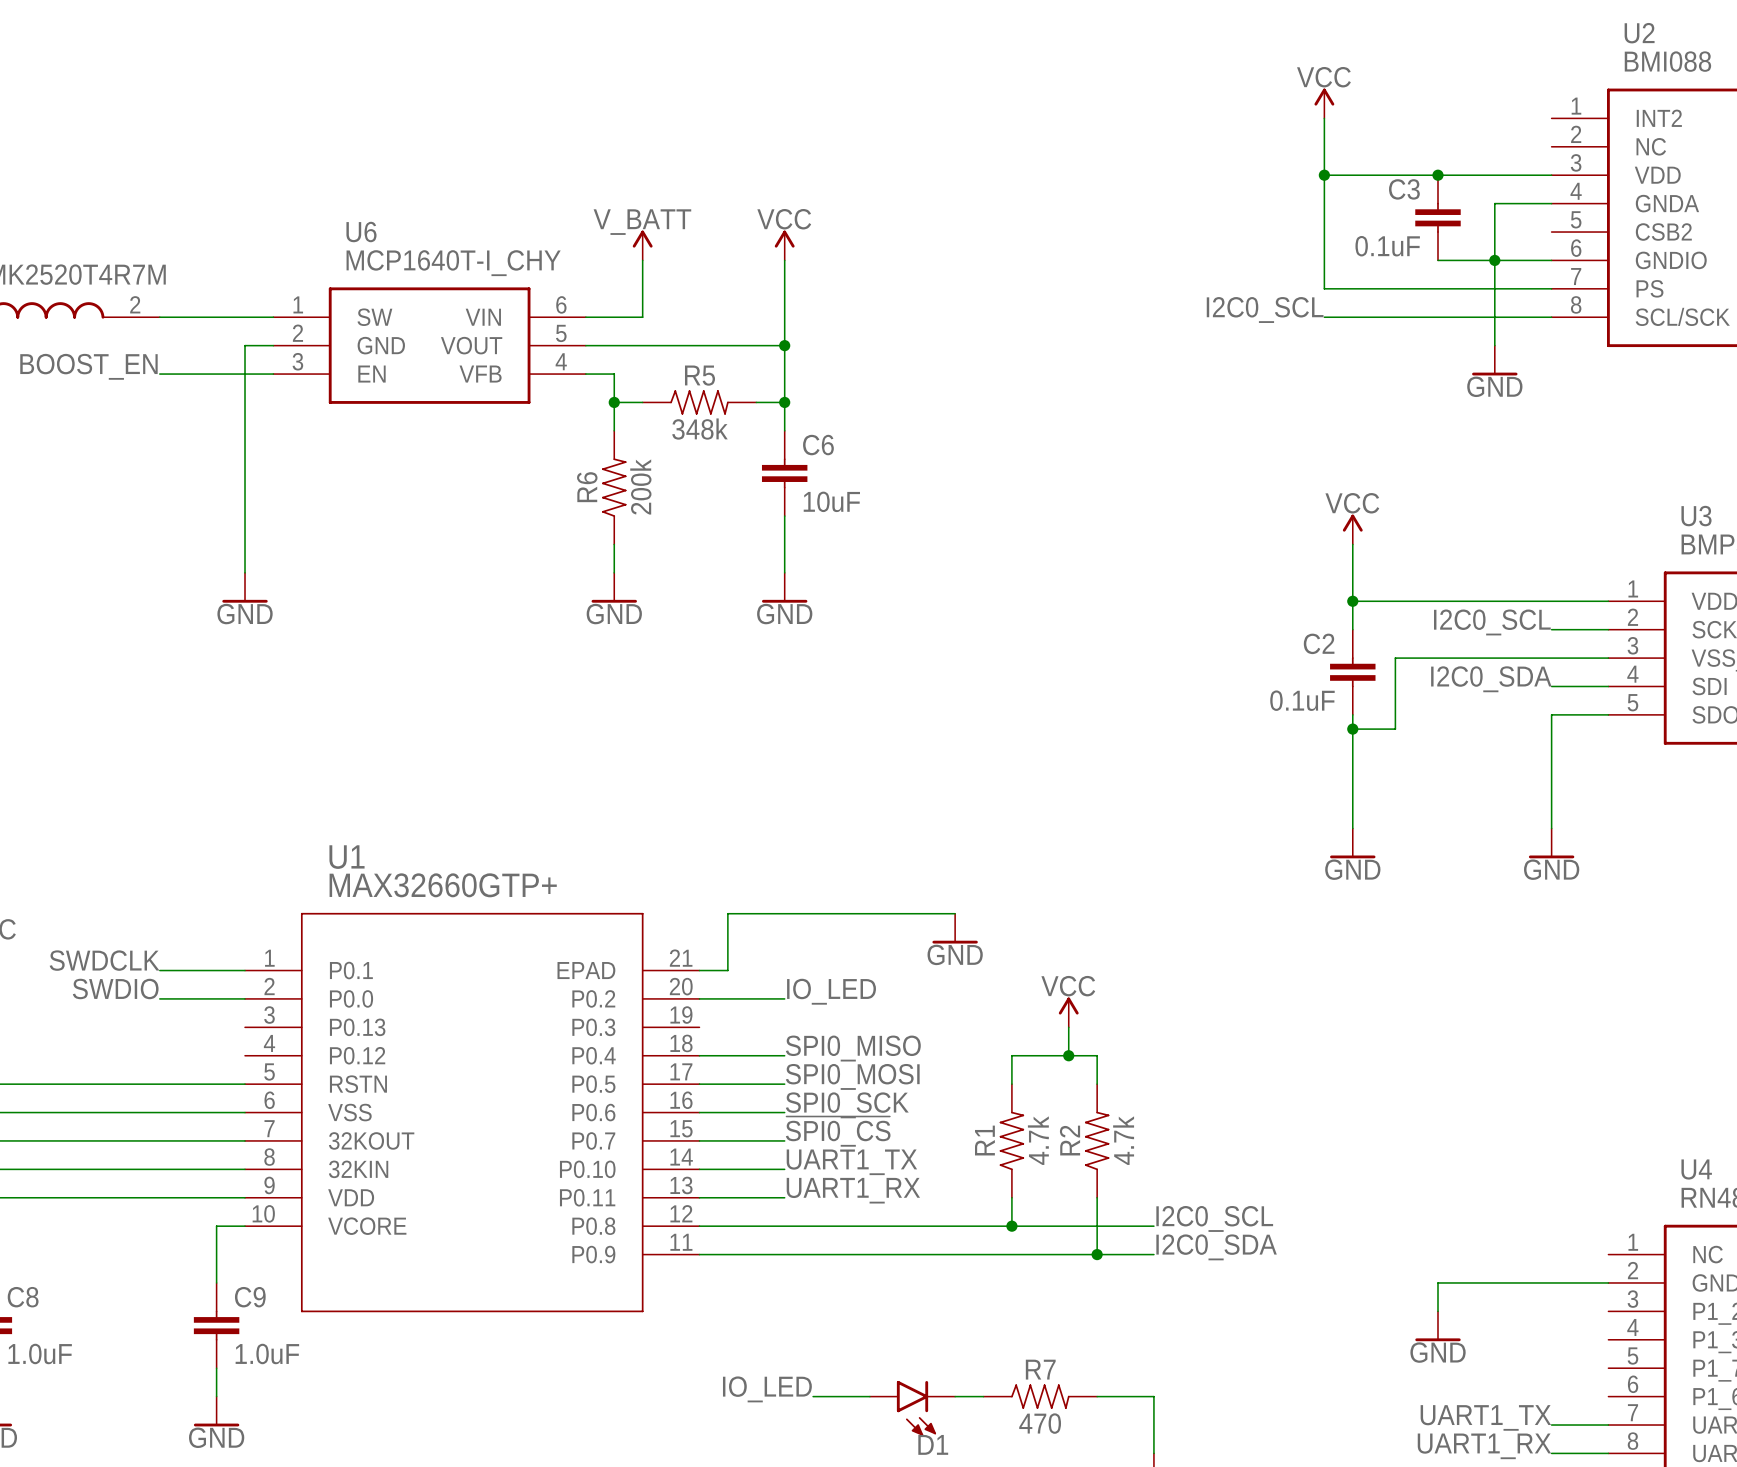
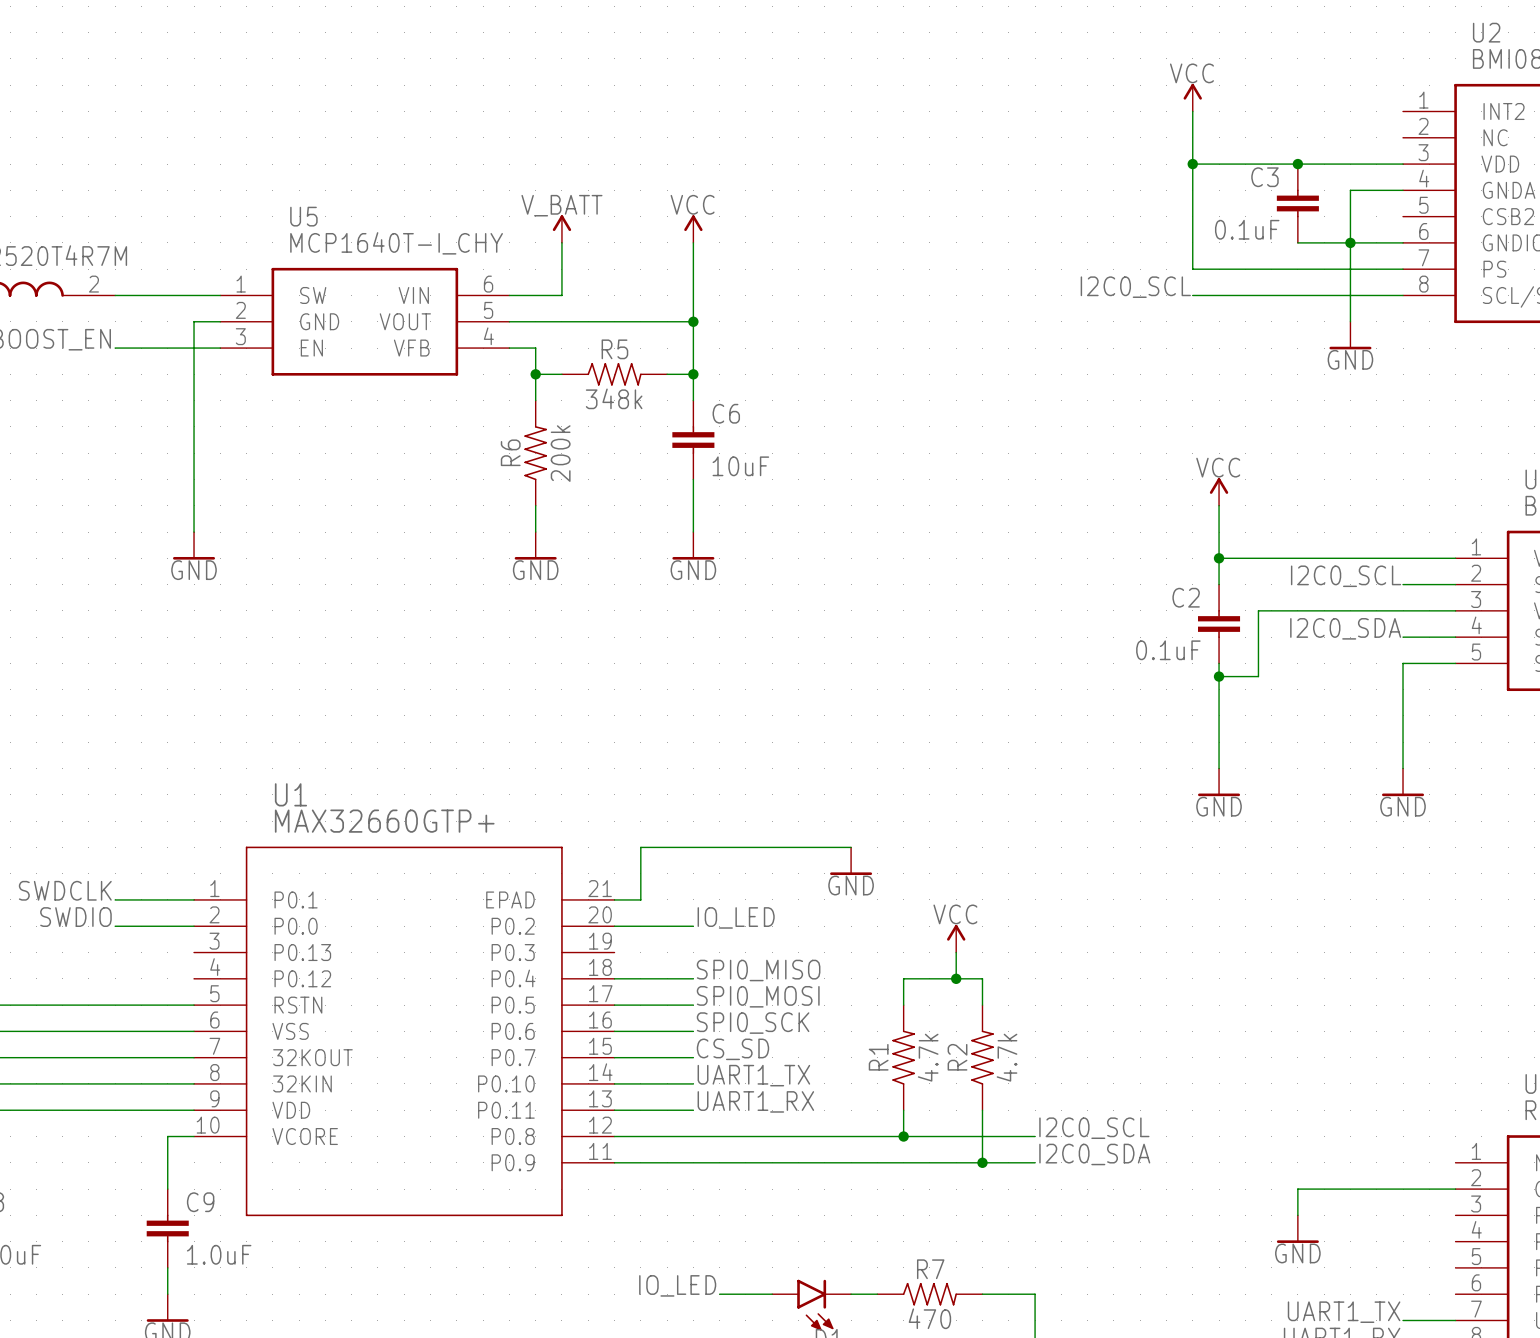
U6 name: U6 (361, 232) -> U5 (303, 216)
label: ~{SPI0_CS} (838, 1131) -> CS_SD (732, 1049)

